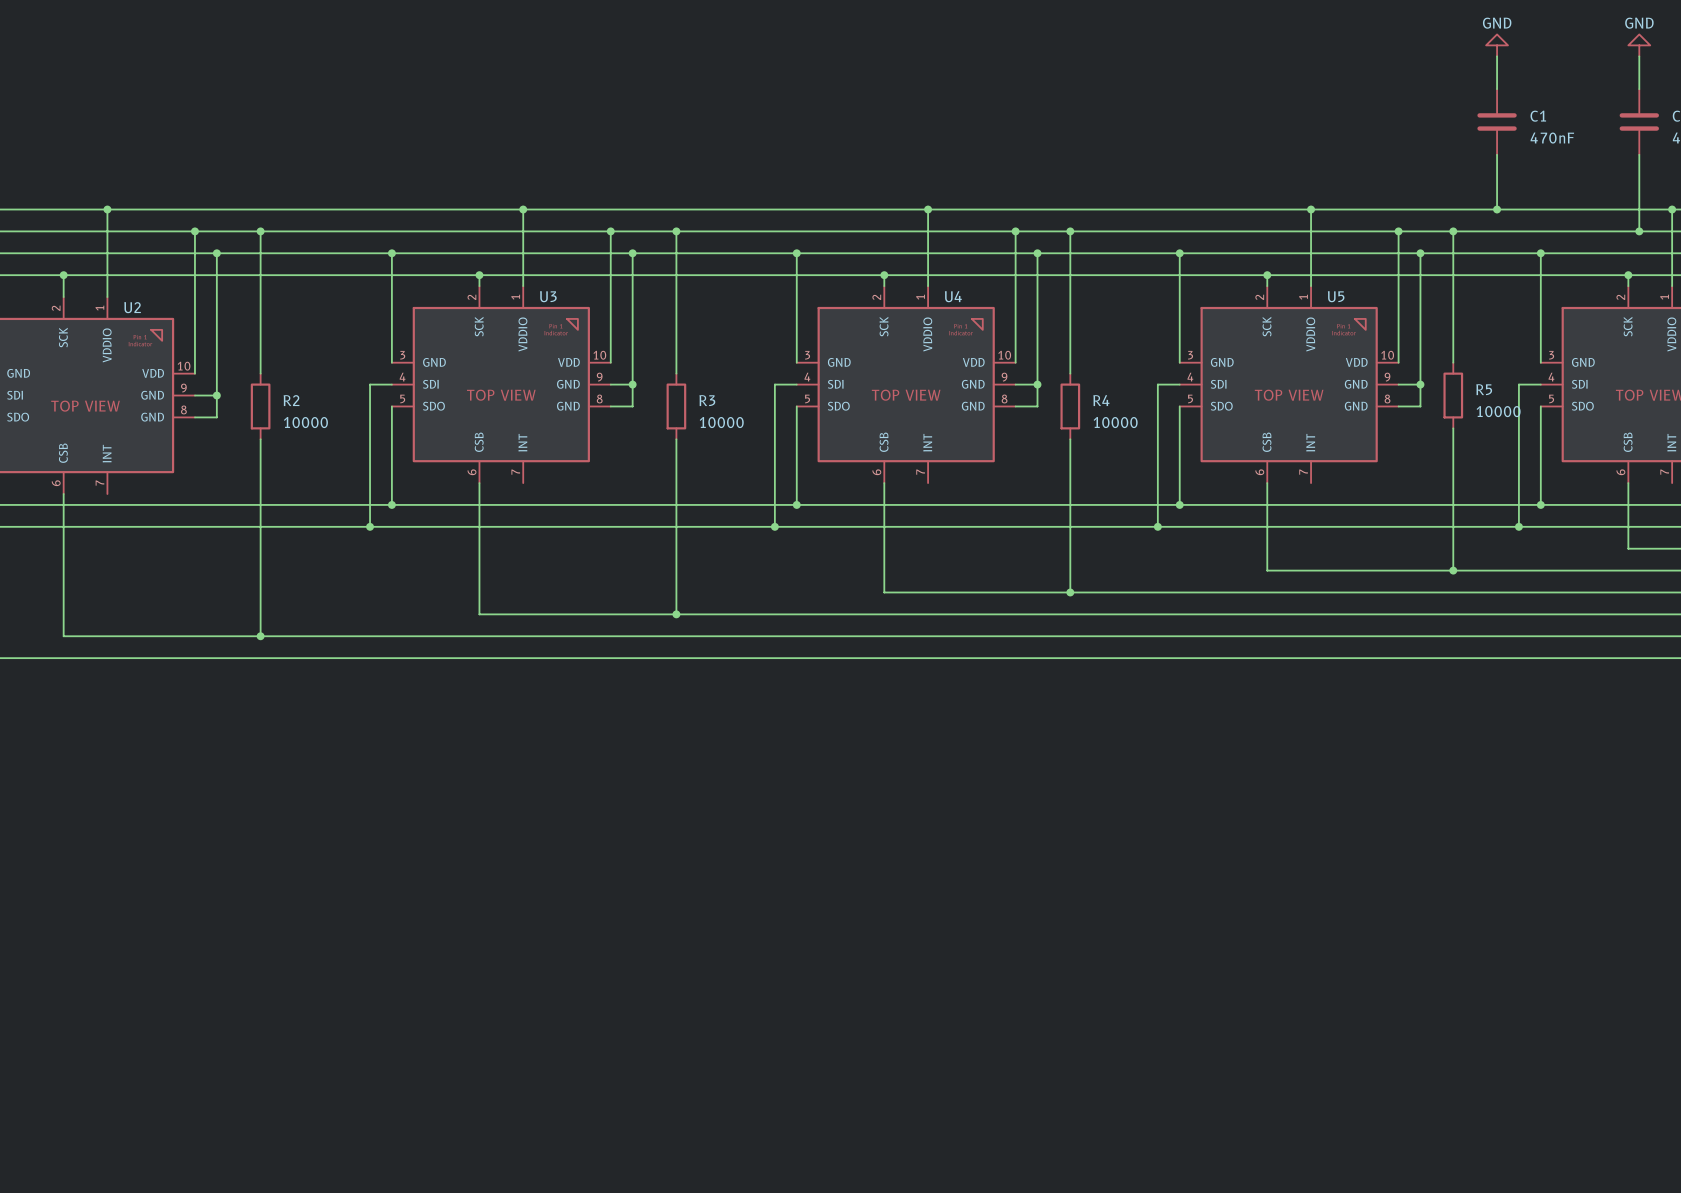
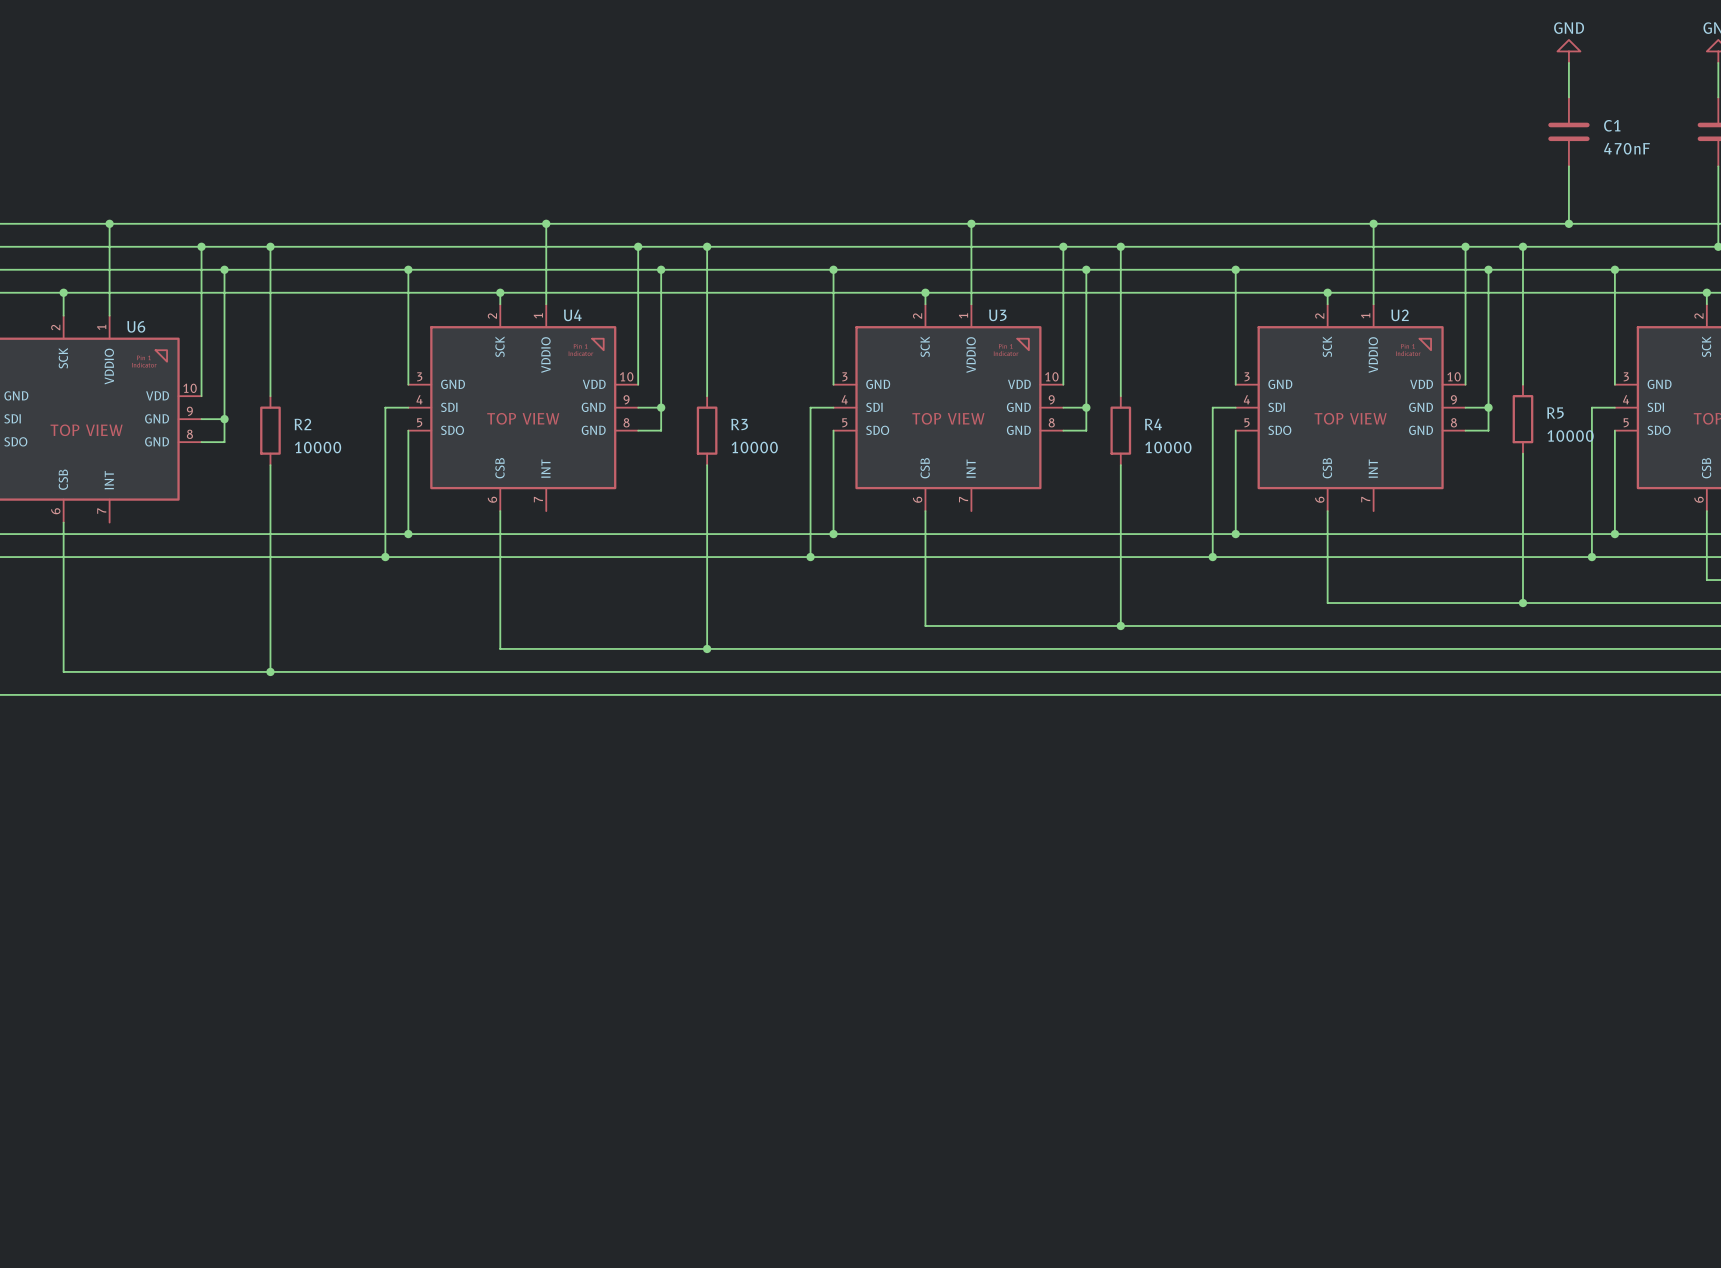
U3 name: U3 (548, 296) -> U4 (572, 315)
U4 name: U4 (953, 296) -> U3 (997, 315)
U5 name: U5 (1336, 296) -> U2 (1400, 315)
U2 name: U2 (132, 307) -> U6 (136, 326)

